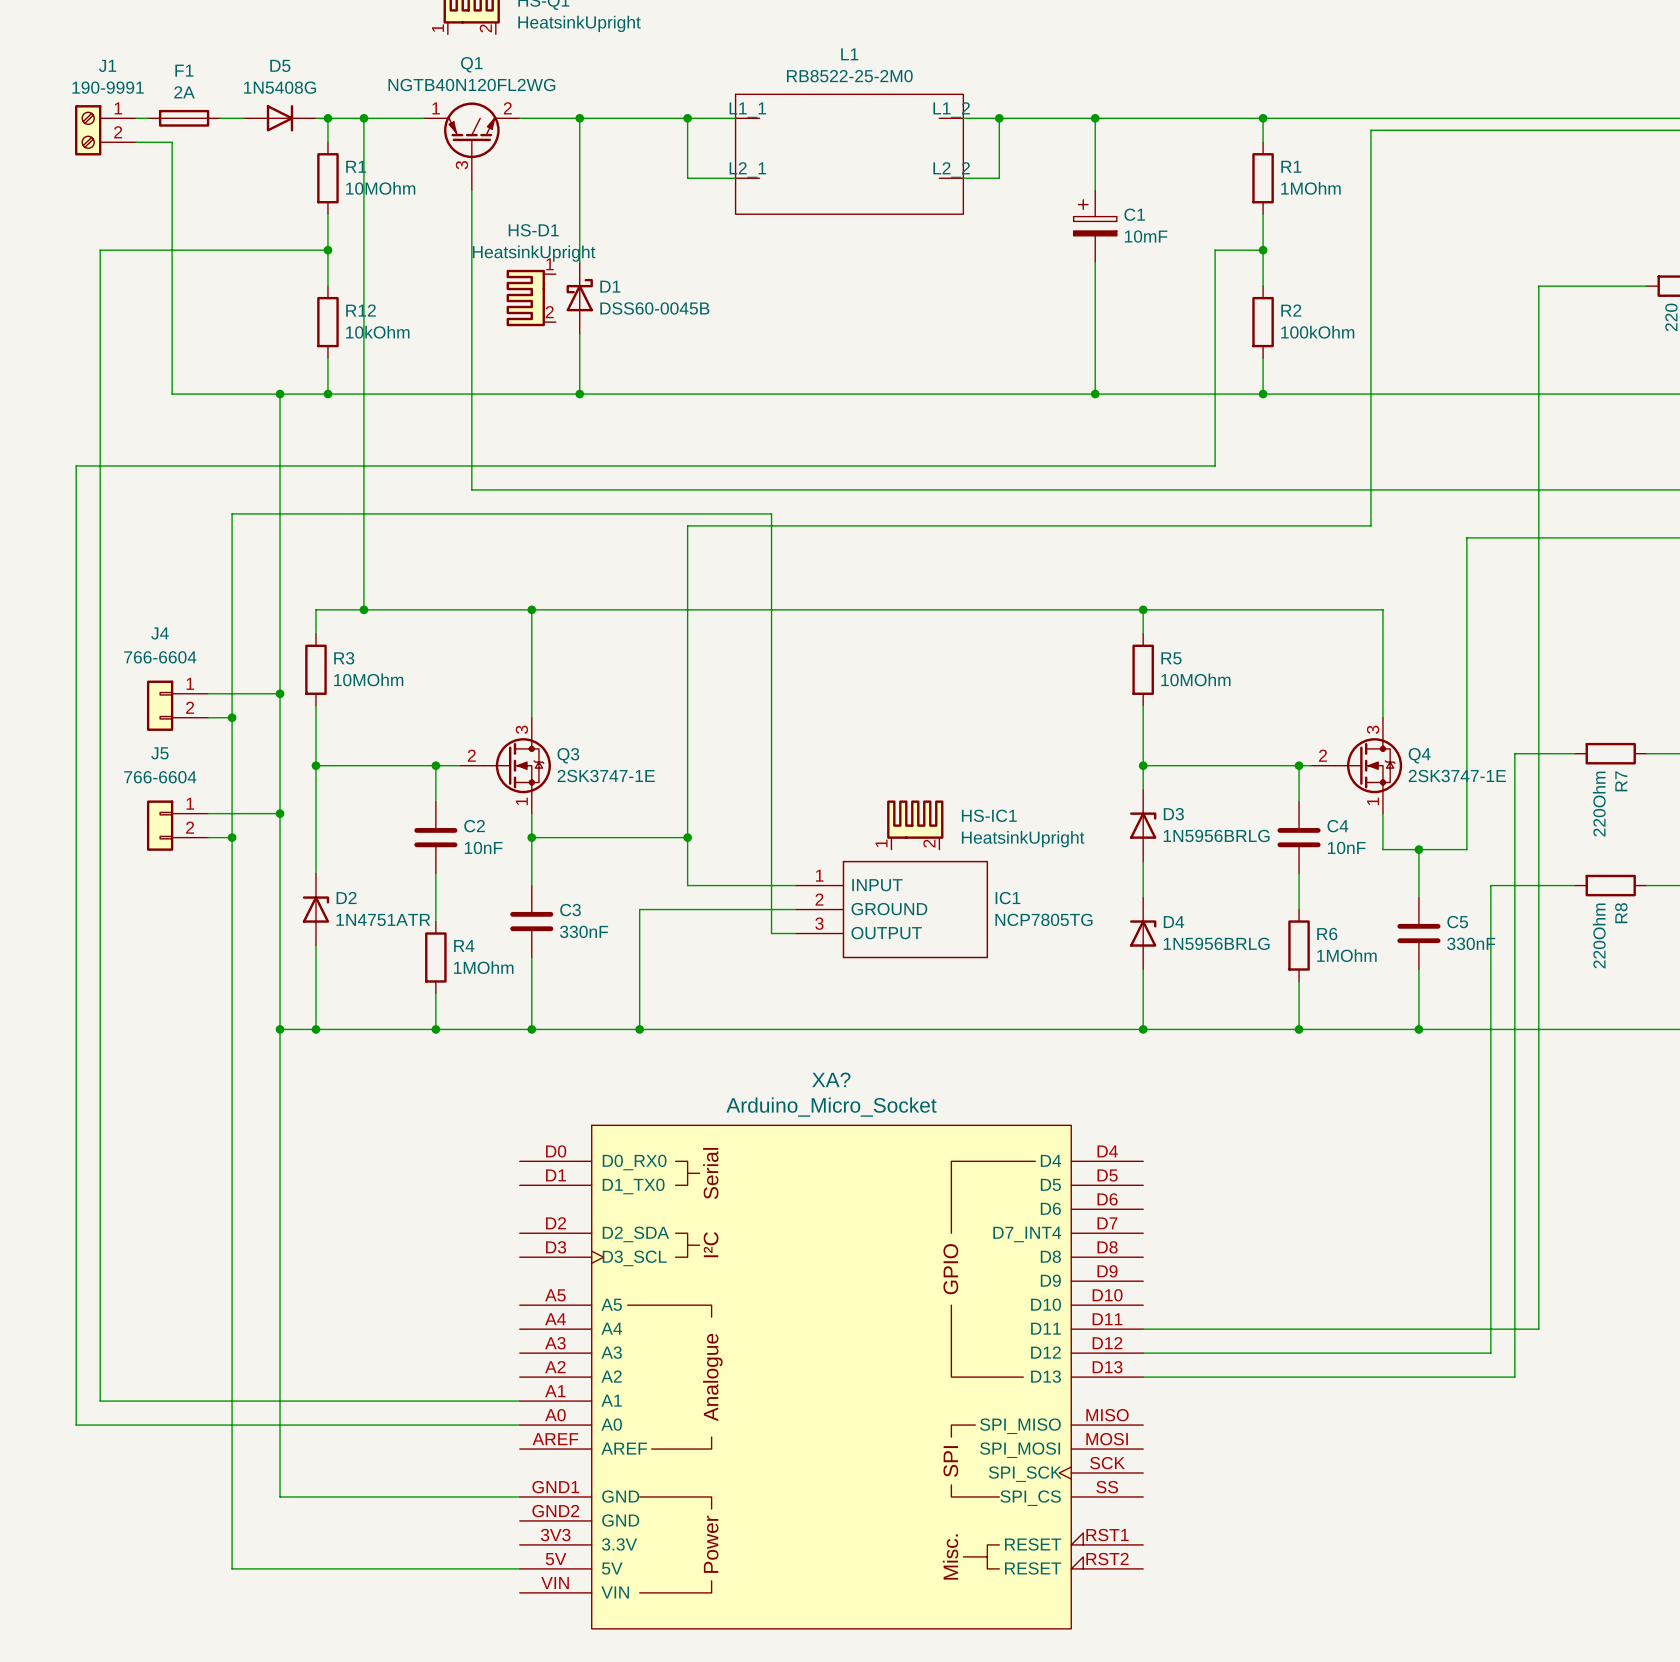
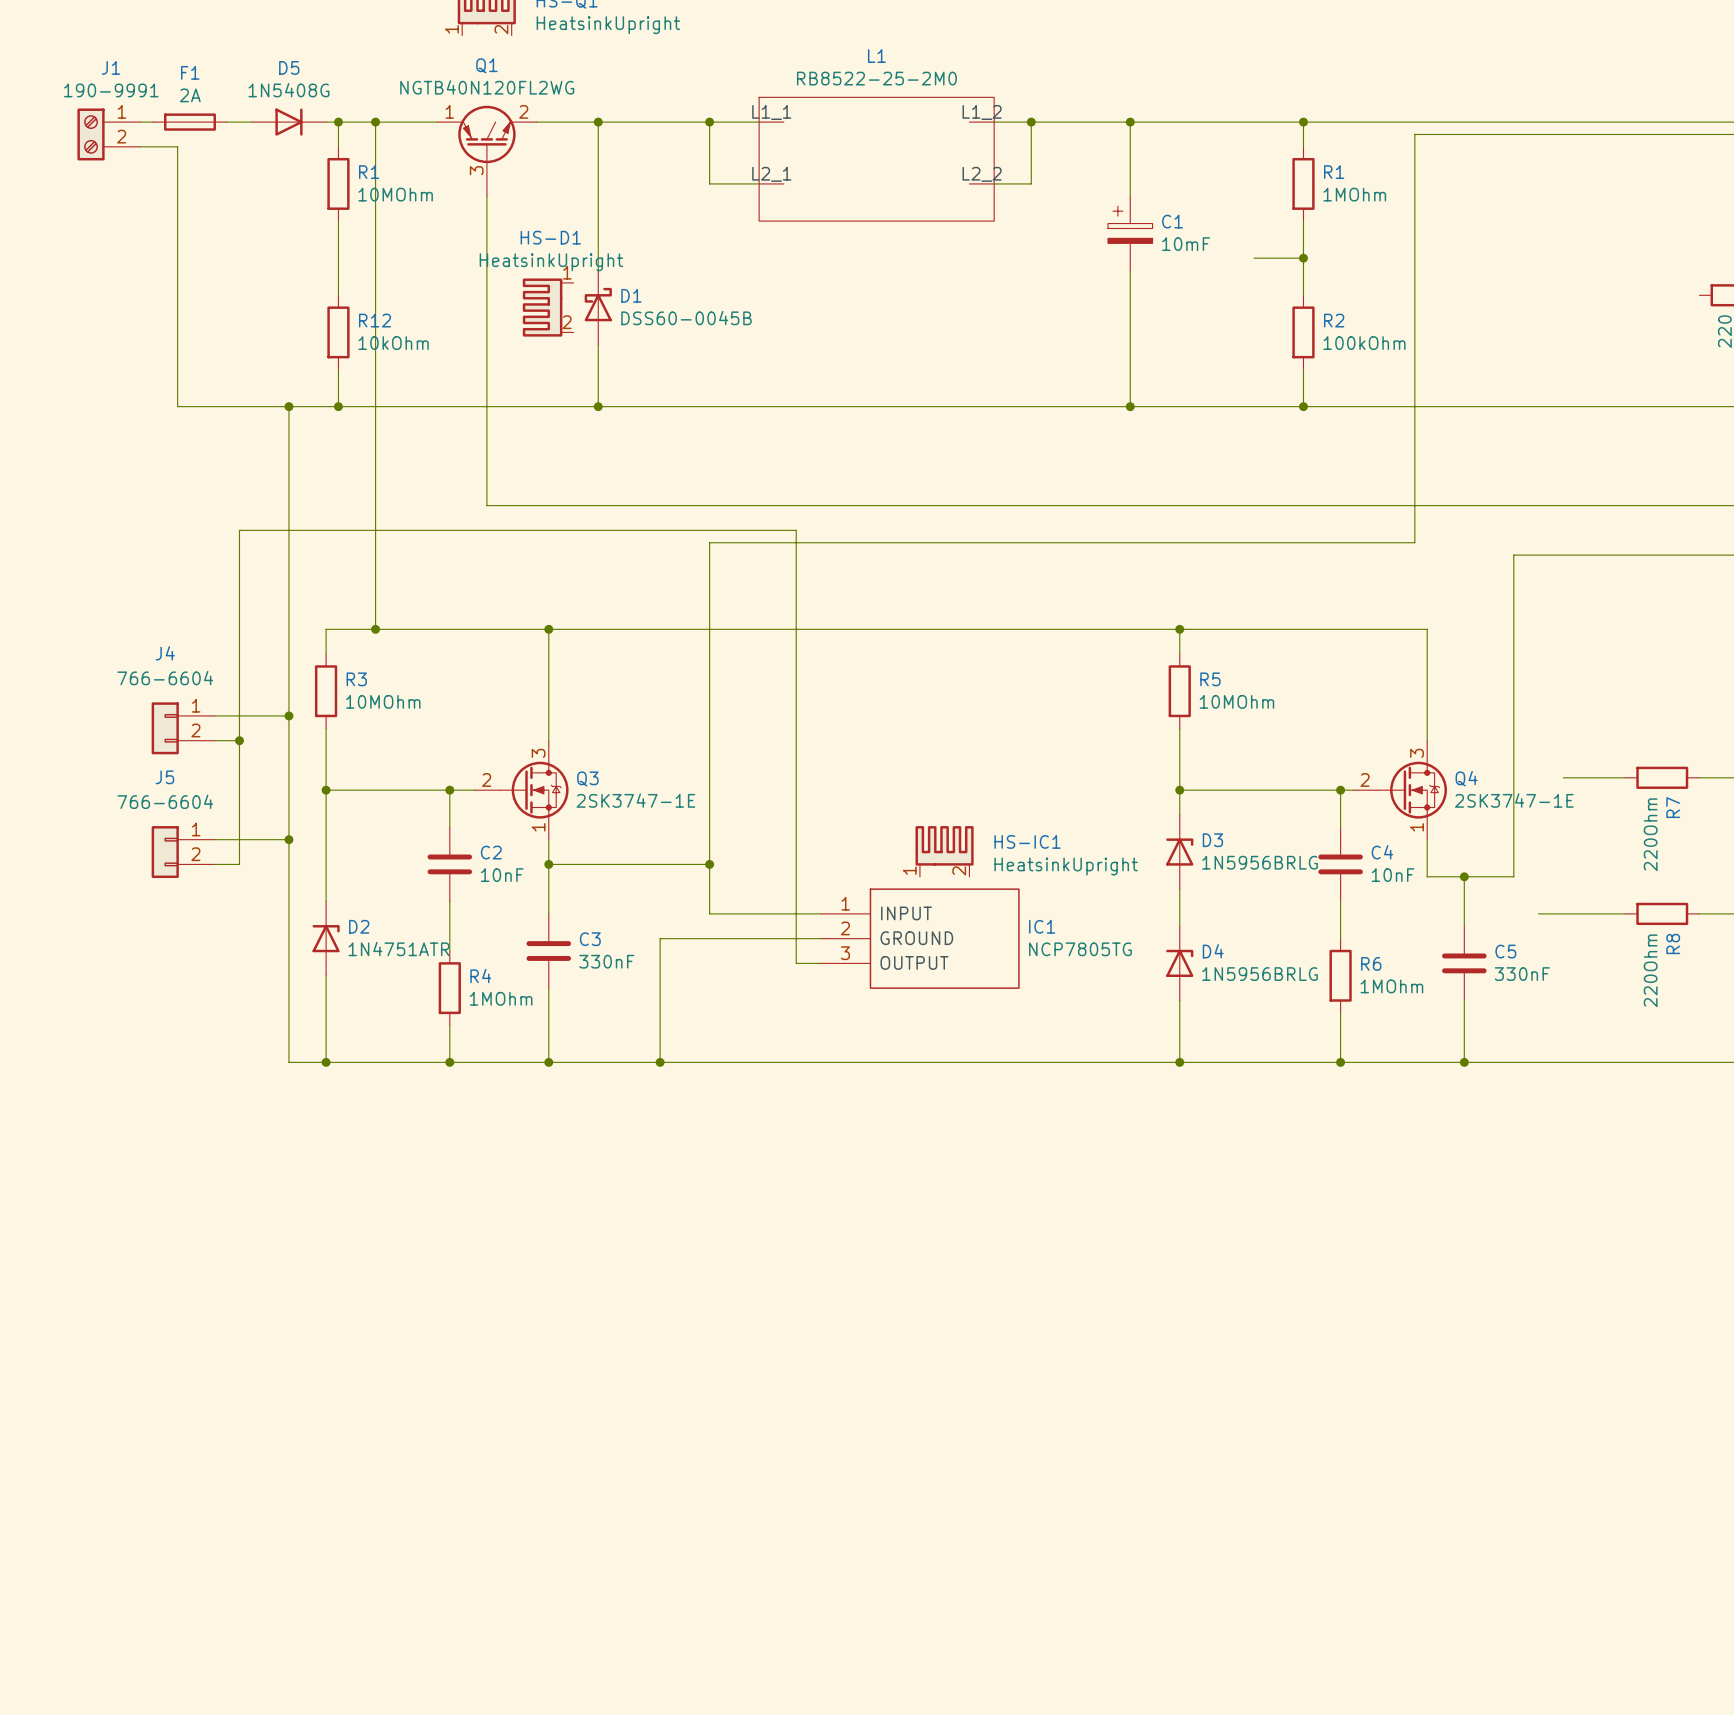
wire: (327, 250) (100, 250) (100, 1401) (519, 1401) -> none
junction: (327, 250) -> none
wire: (1215, 250) (1215, 465) (76, 465) (76, 1425) (519, 1425) -> none
wire: (1646, 286) (1538, 286) (1538, 1329) (1143, 1329) -> none
wire: (1514, 753) (1514, 1377) (1143, 1377) -> none
wire: (232, 837) (232, 1568) (519, 1568) -> none
junction: (232, 837) -> none
wire: (1490, 885) (1490, 1353) (1143, 1353) -> none
wire: (280, 1029) (280, 1496) (519, 1496) -> none
junction: (280, 1029) -> none
XA?: Arduino_Micro_Socket (831, 1377) -> none

